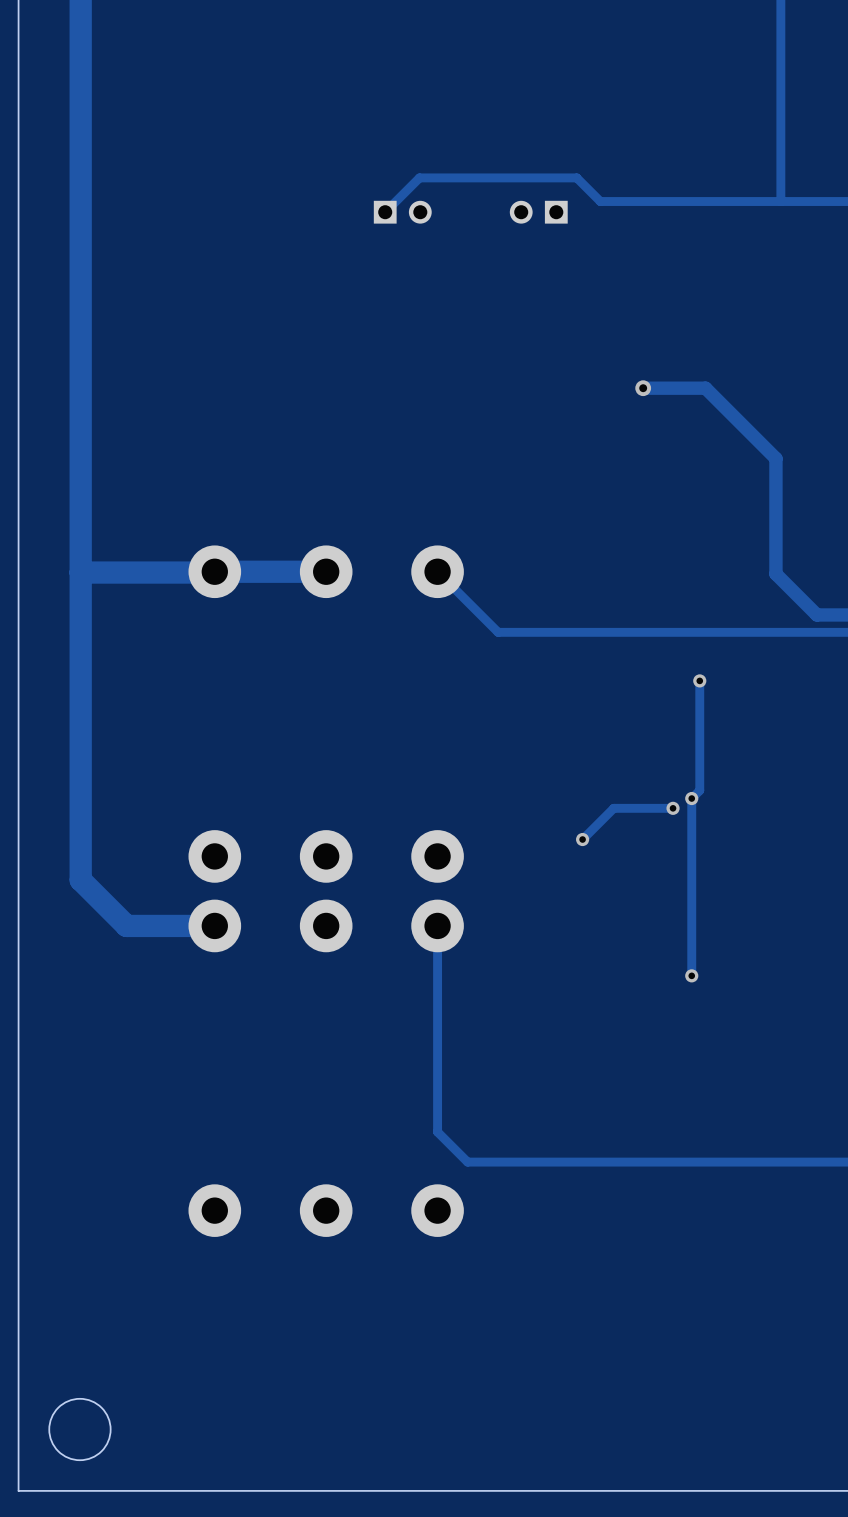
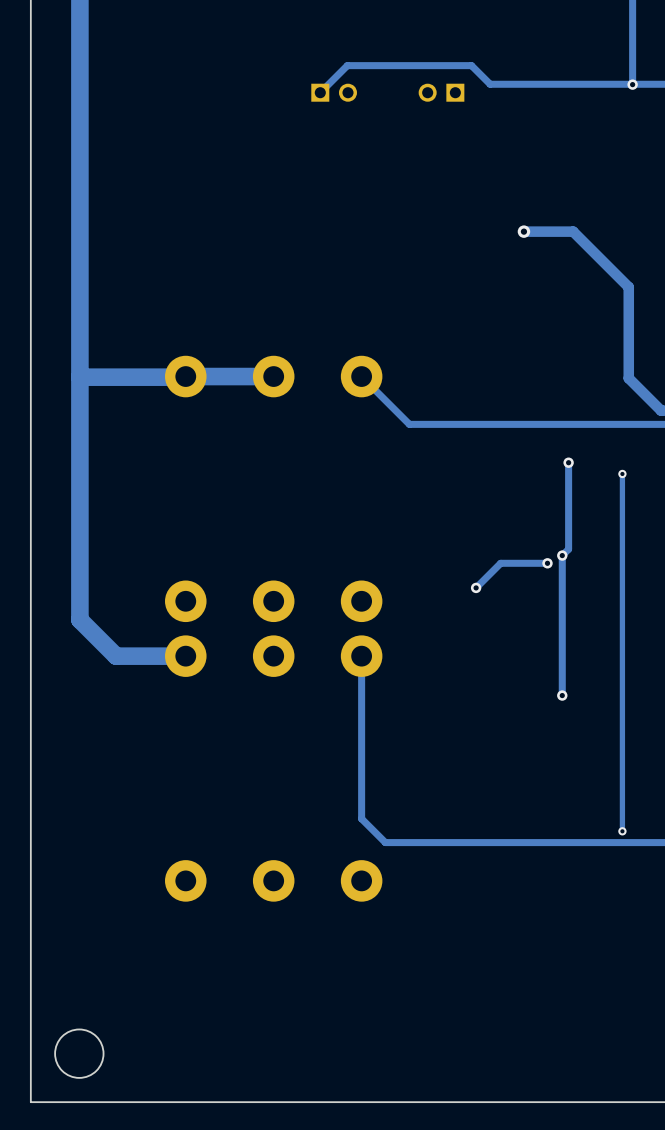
via: none -> (632, 84)
track: none -> (622, 473) (622, 831)
via: none -> (622, 473)
via: none -> (622, 831)

